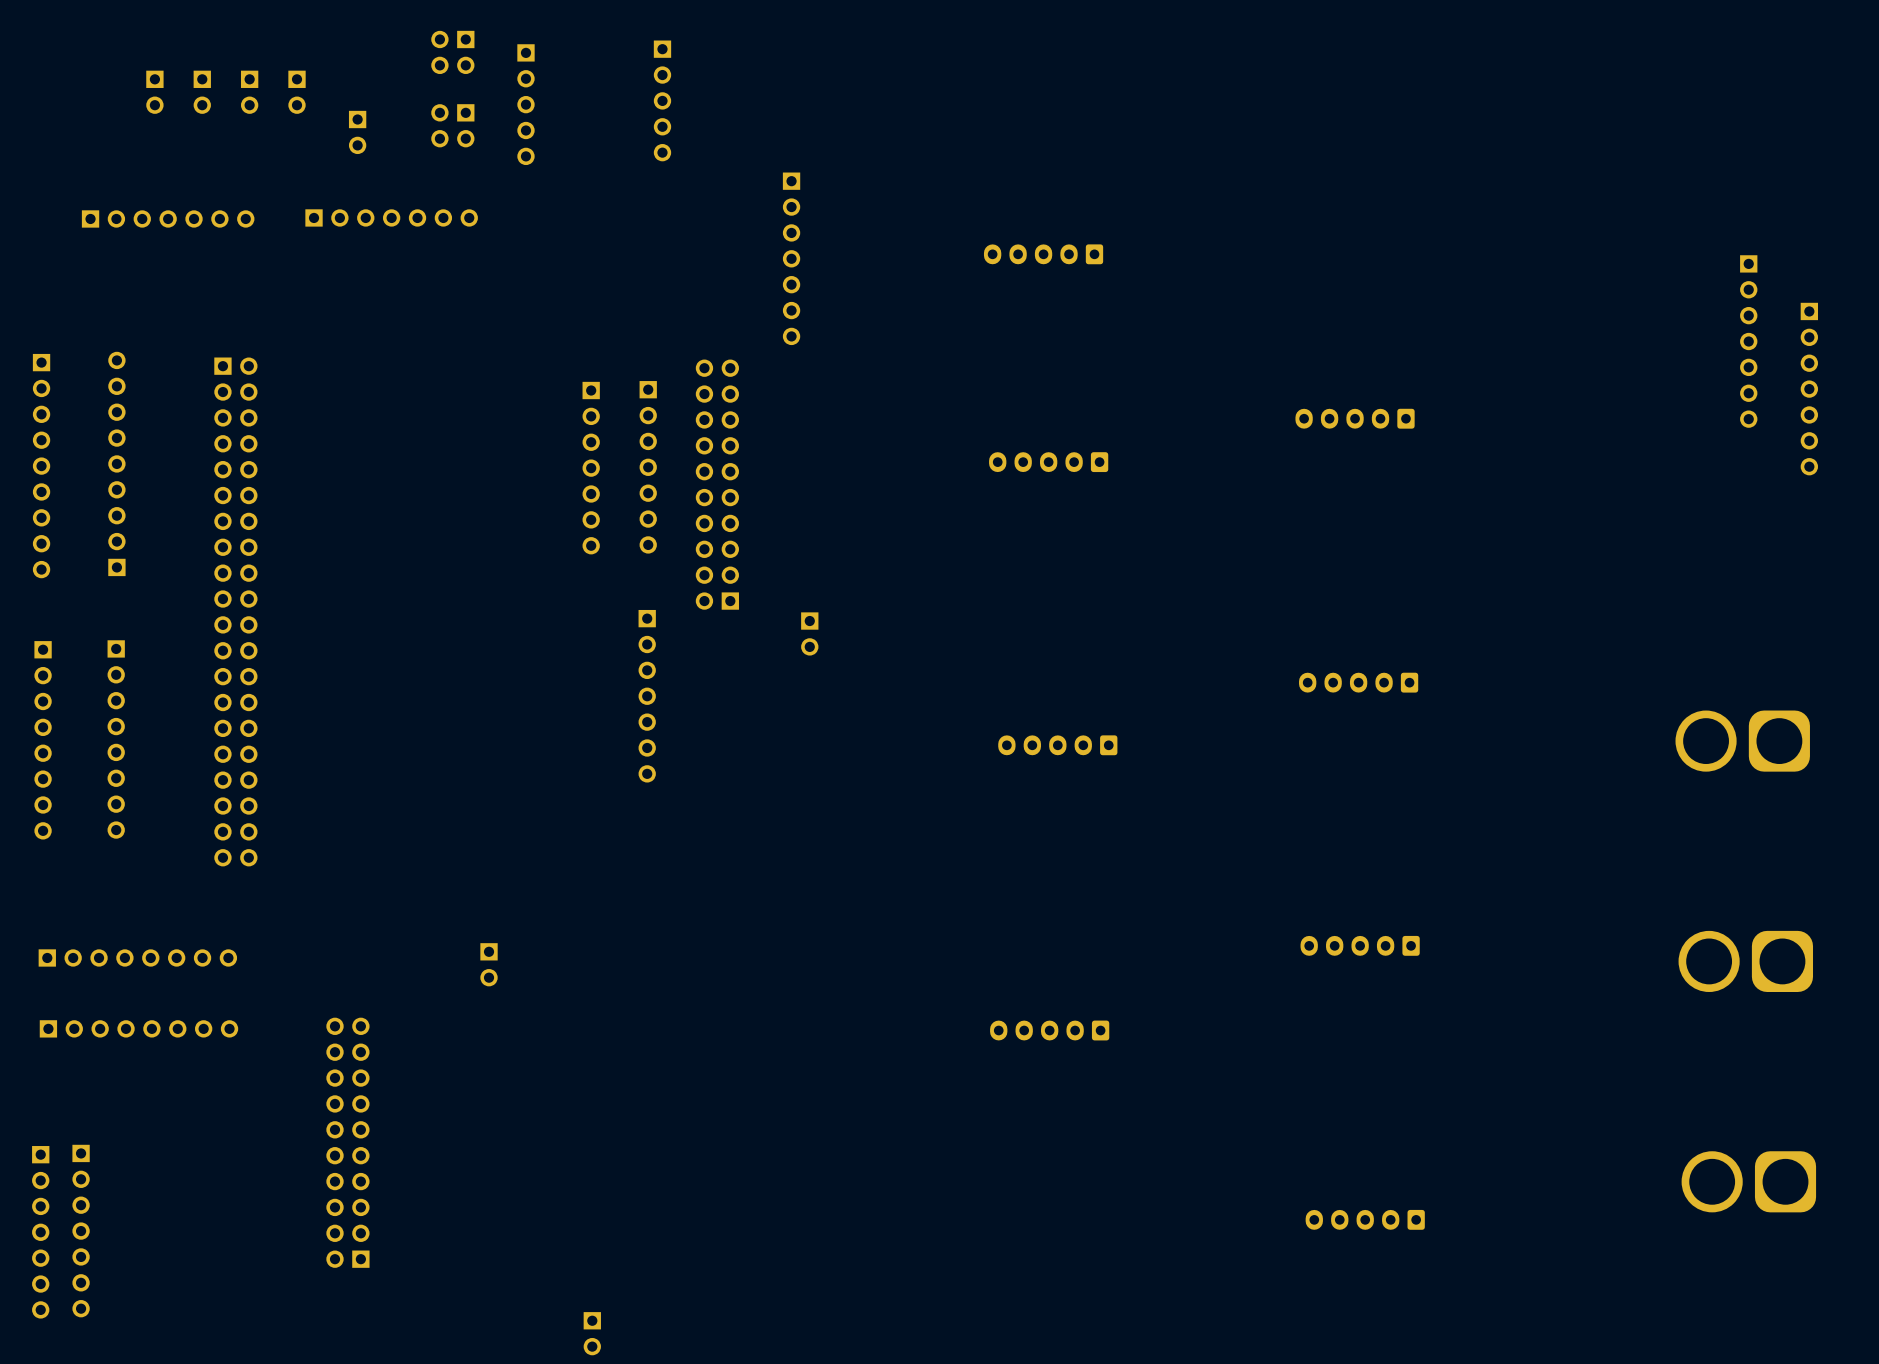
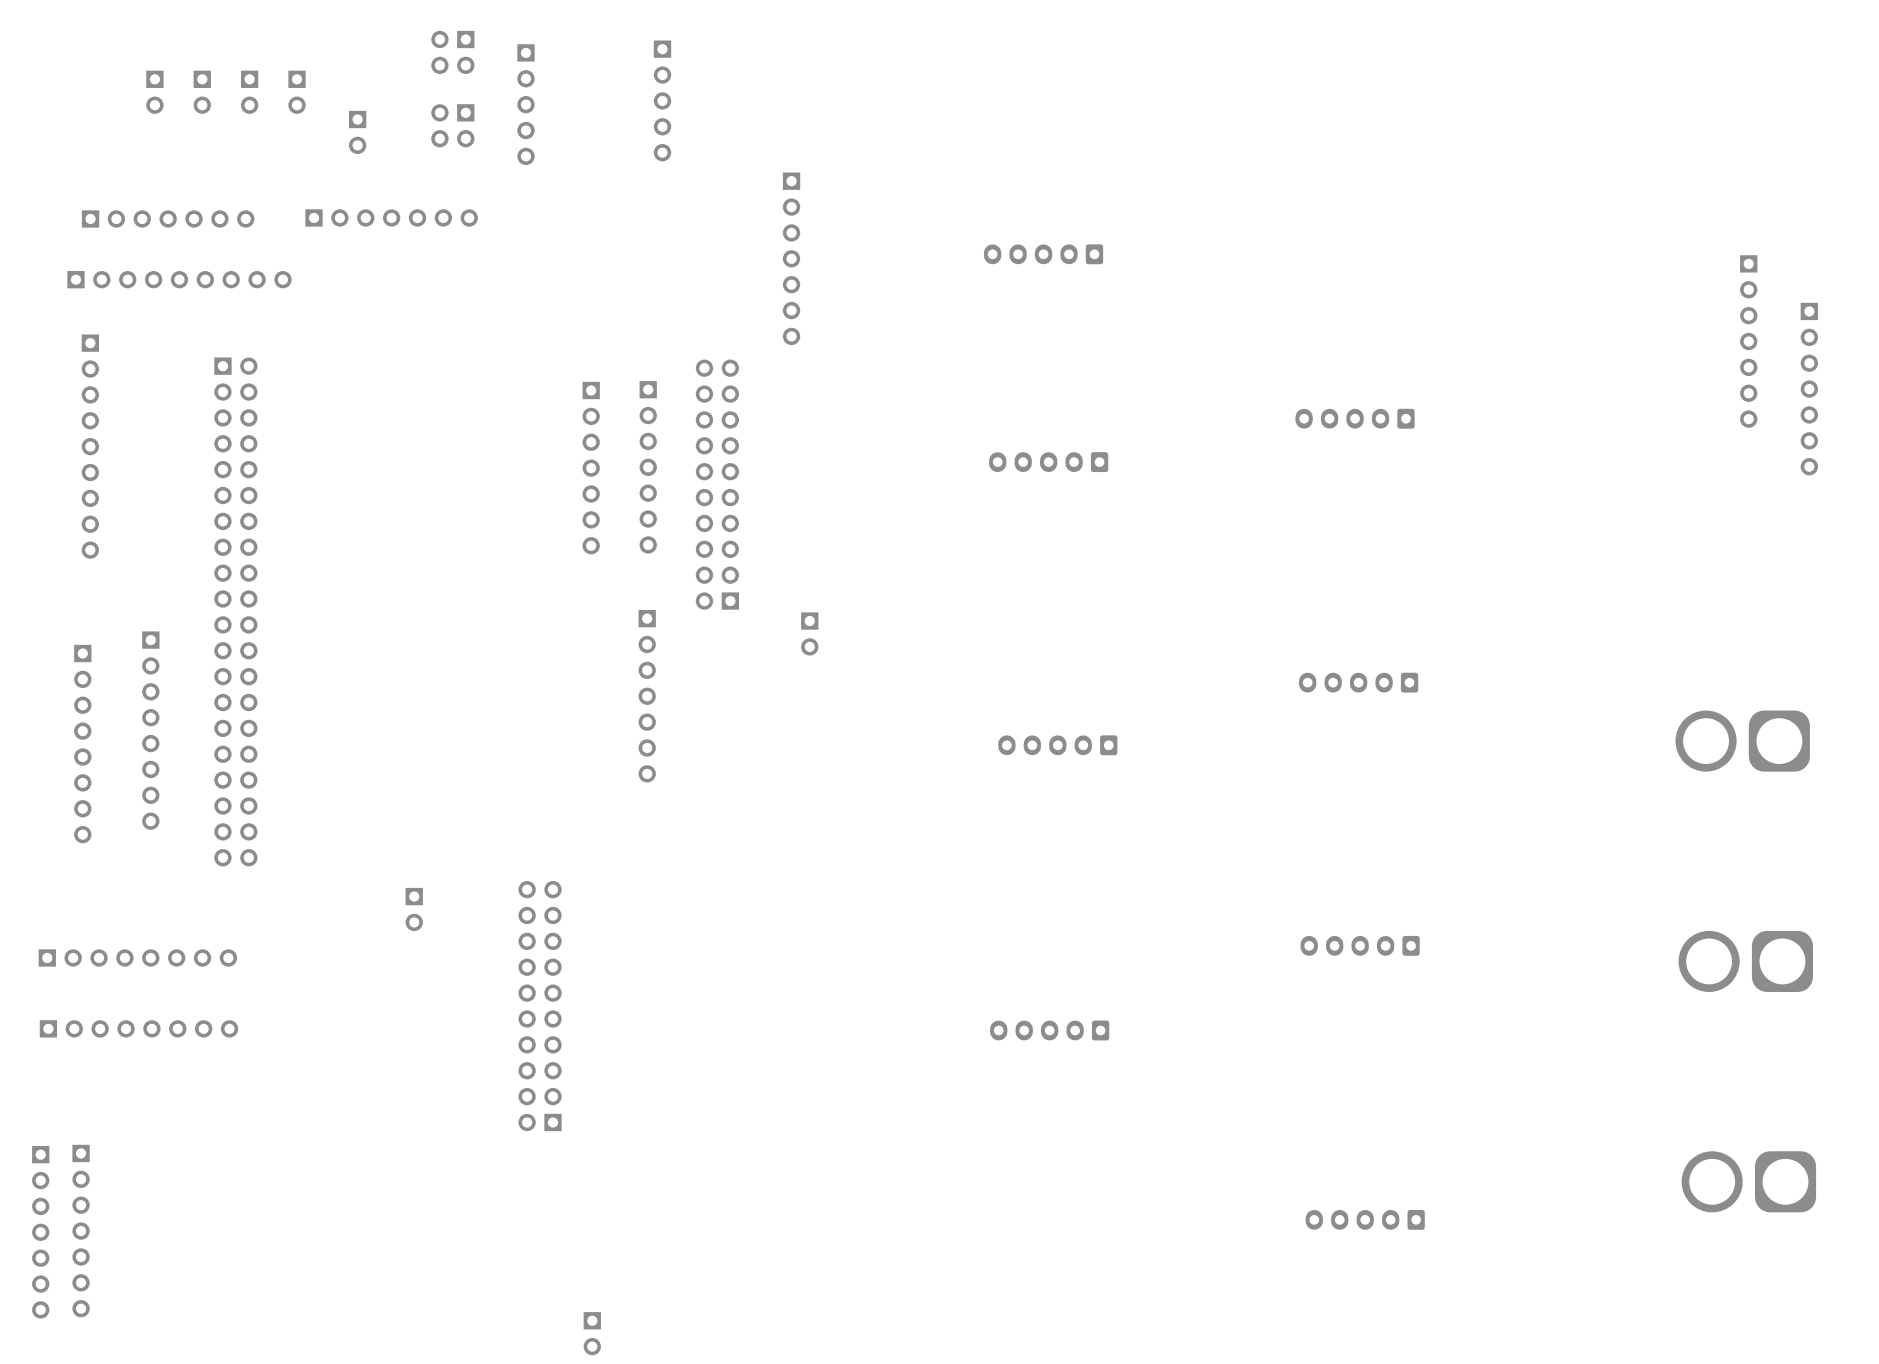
part: none -> (179, 279)
part: none -> (90, 446)
part: (116, 463) -> none
part: (41, 466) -> none
part: none -> (150, 730)
part: (116, 739) -> none
part: (43, 740) -> none
part: none -> (82, 744)
part position: (489, 964) -> (414, 909)
part position: (347, 1142) -> (540, 1006)

